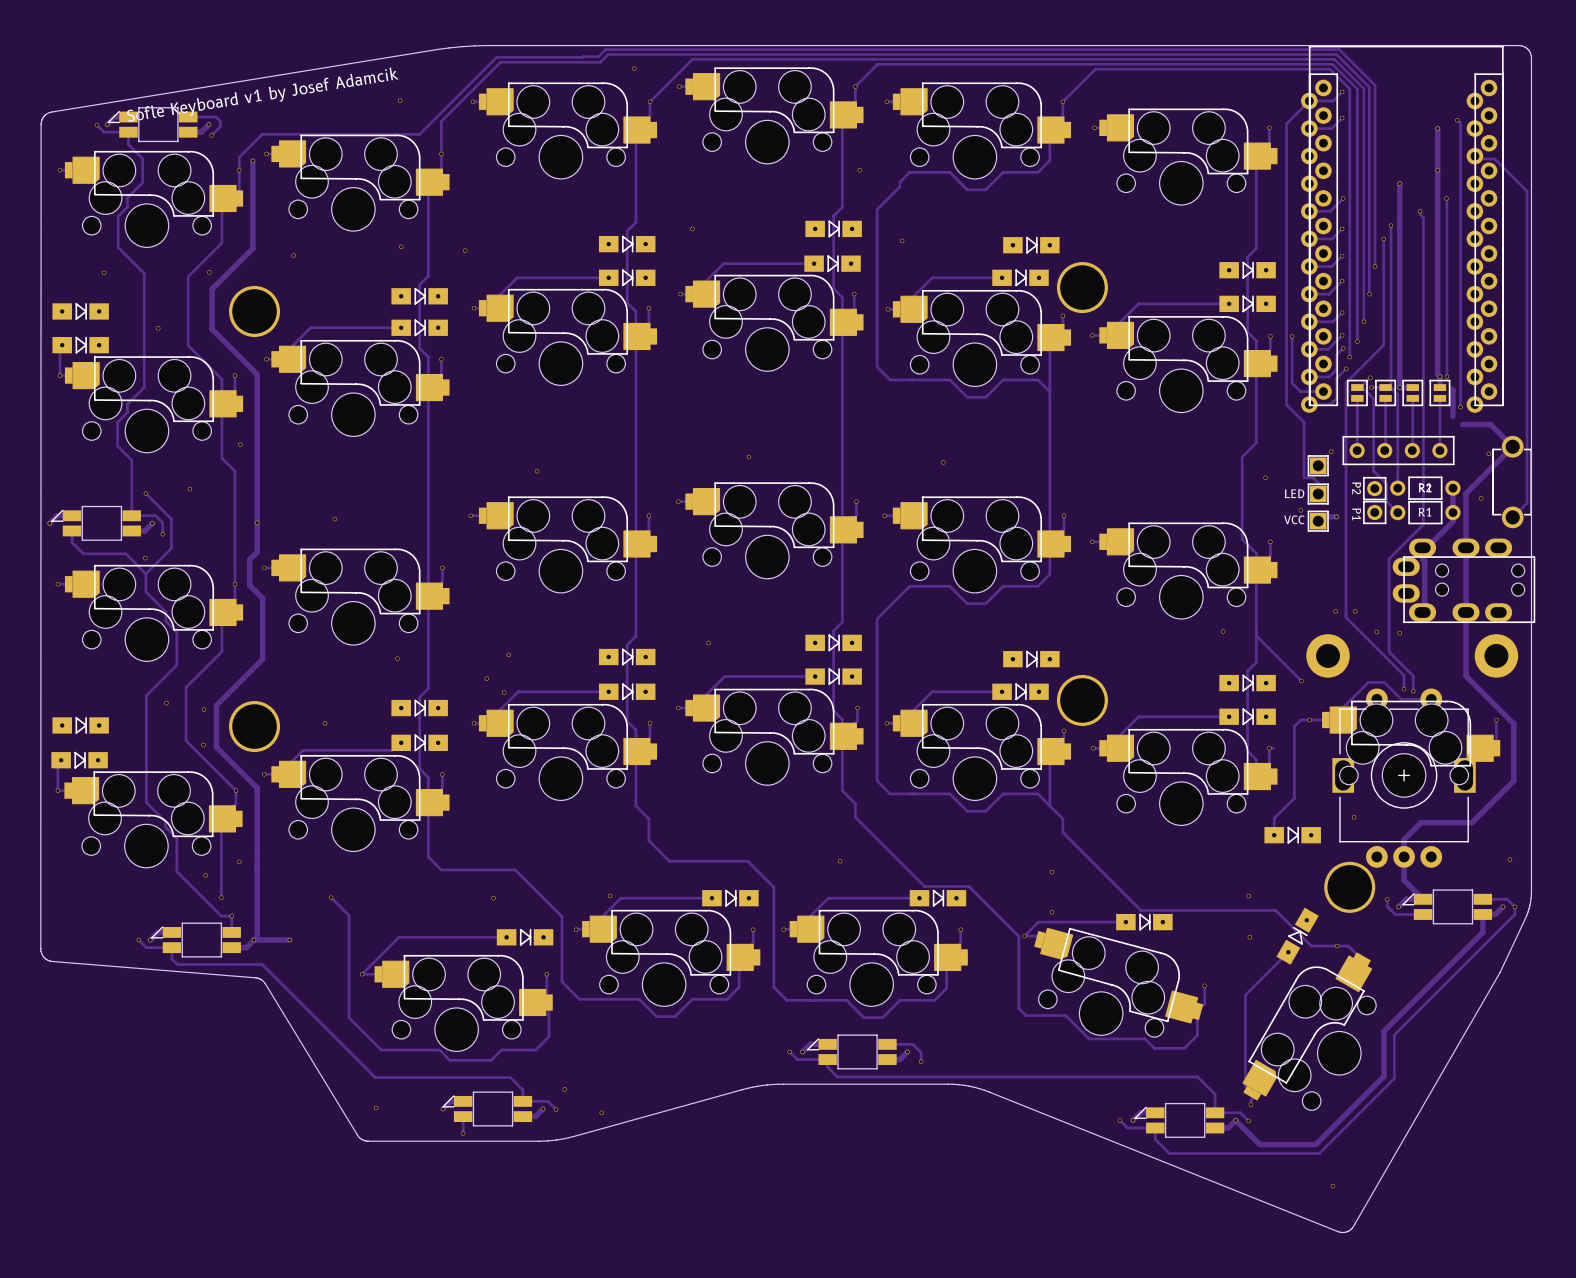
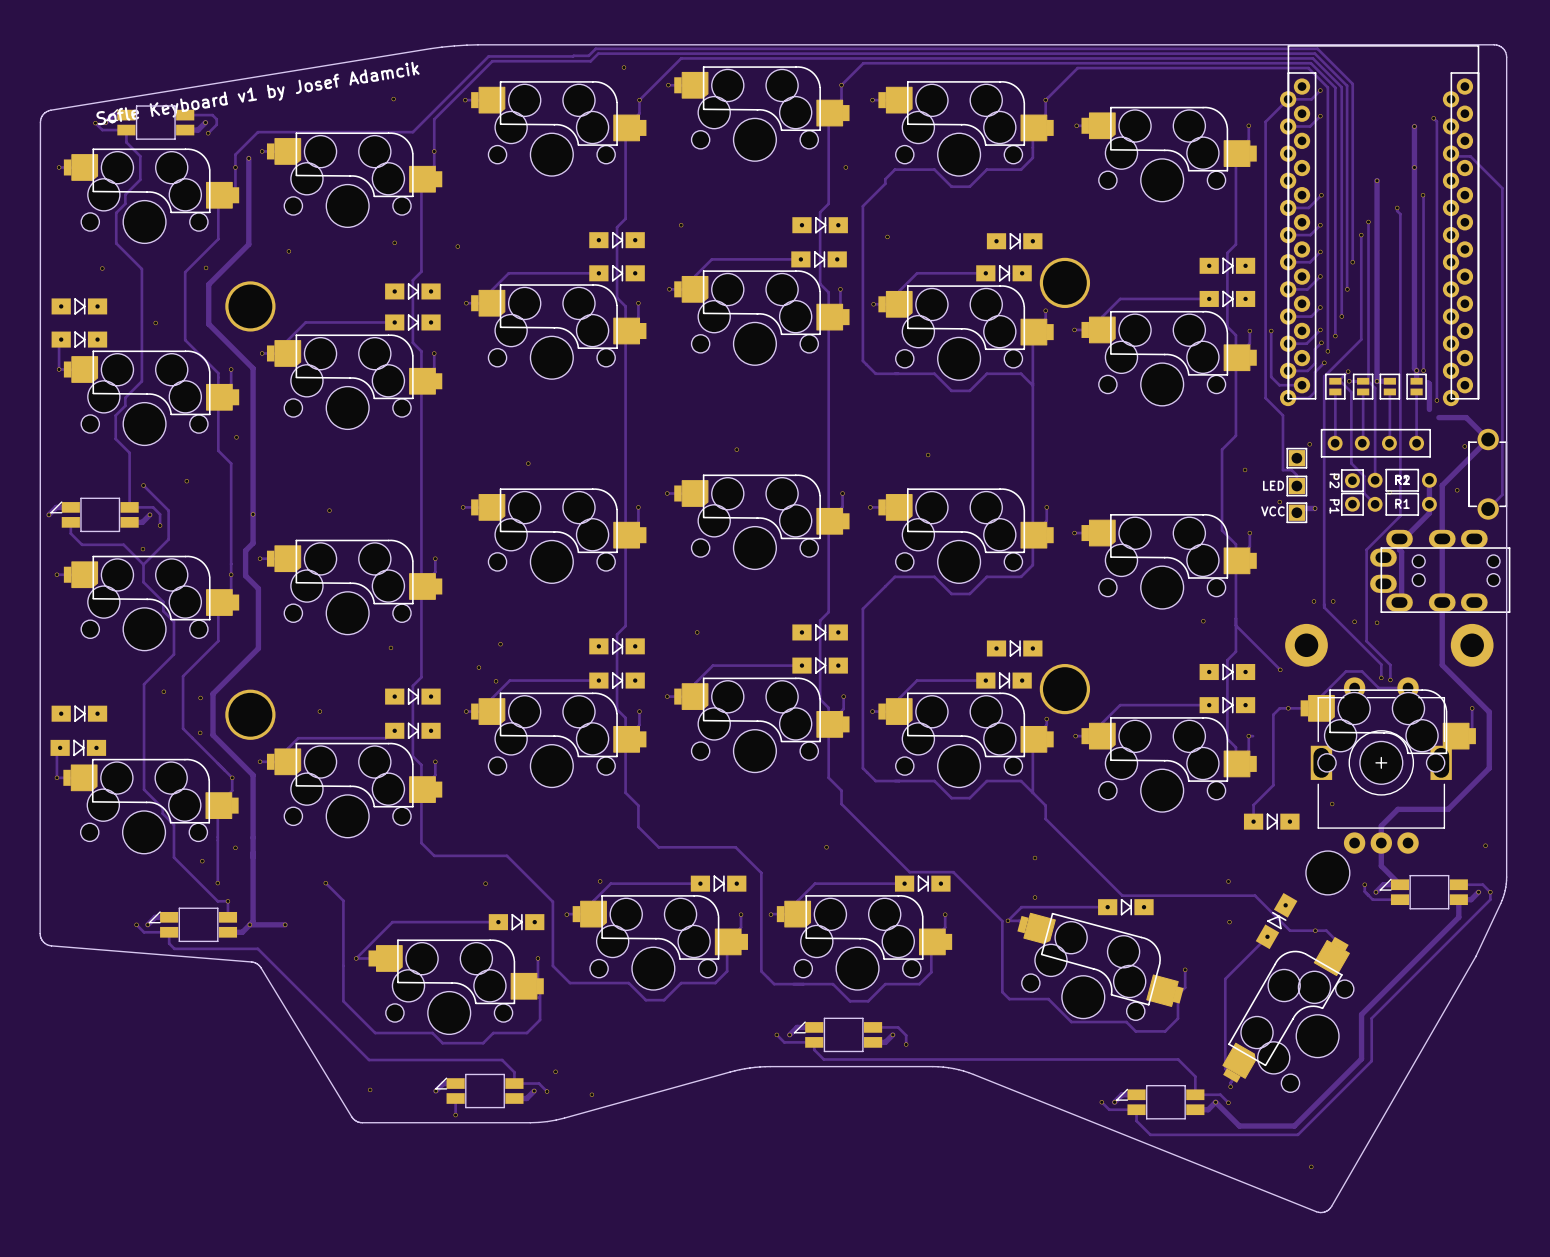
part footprint: [1324, 861, 1376, 913] -> [1305, 851, 1350, 895]

